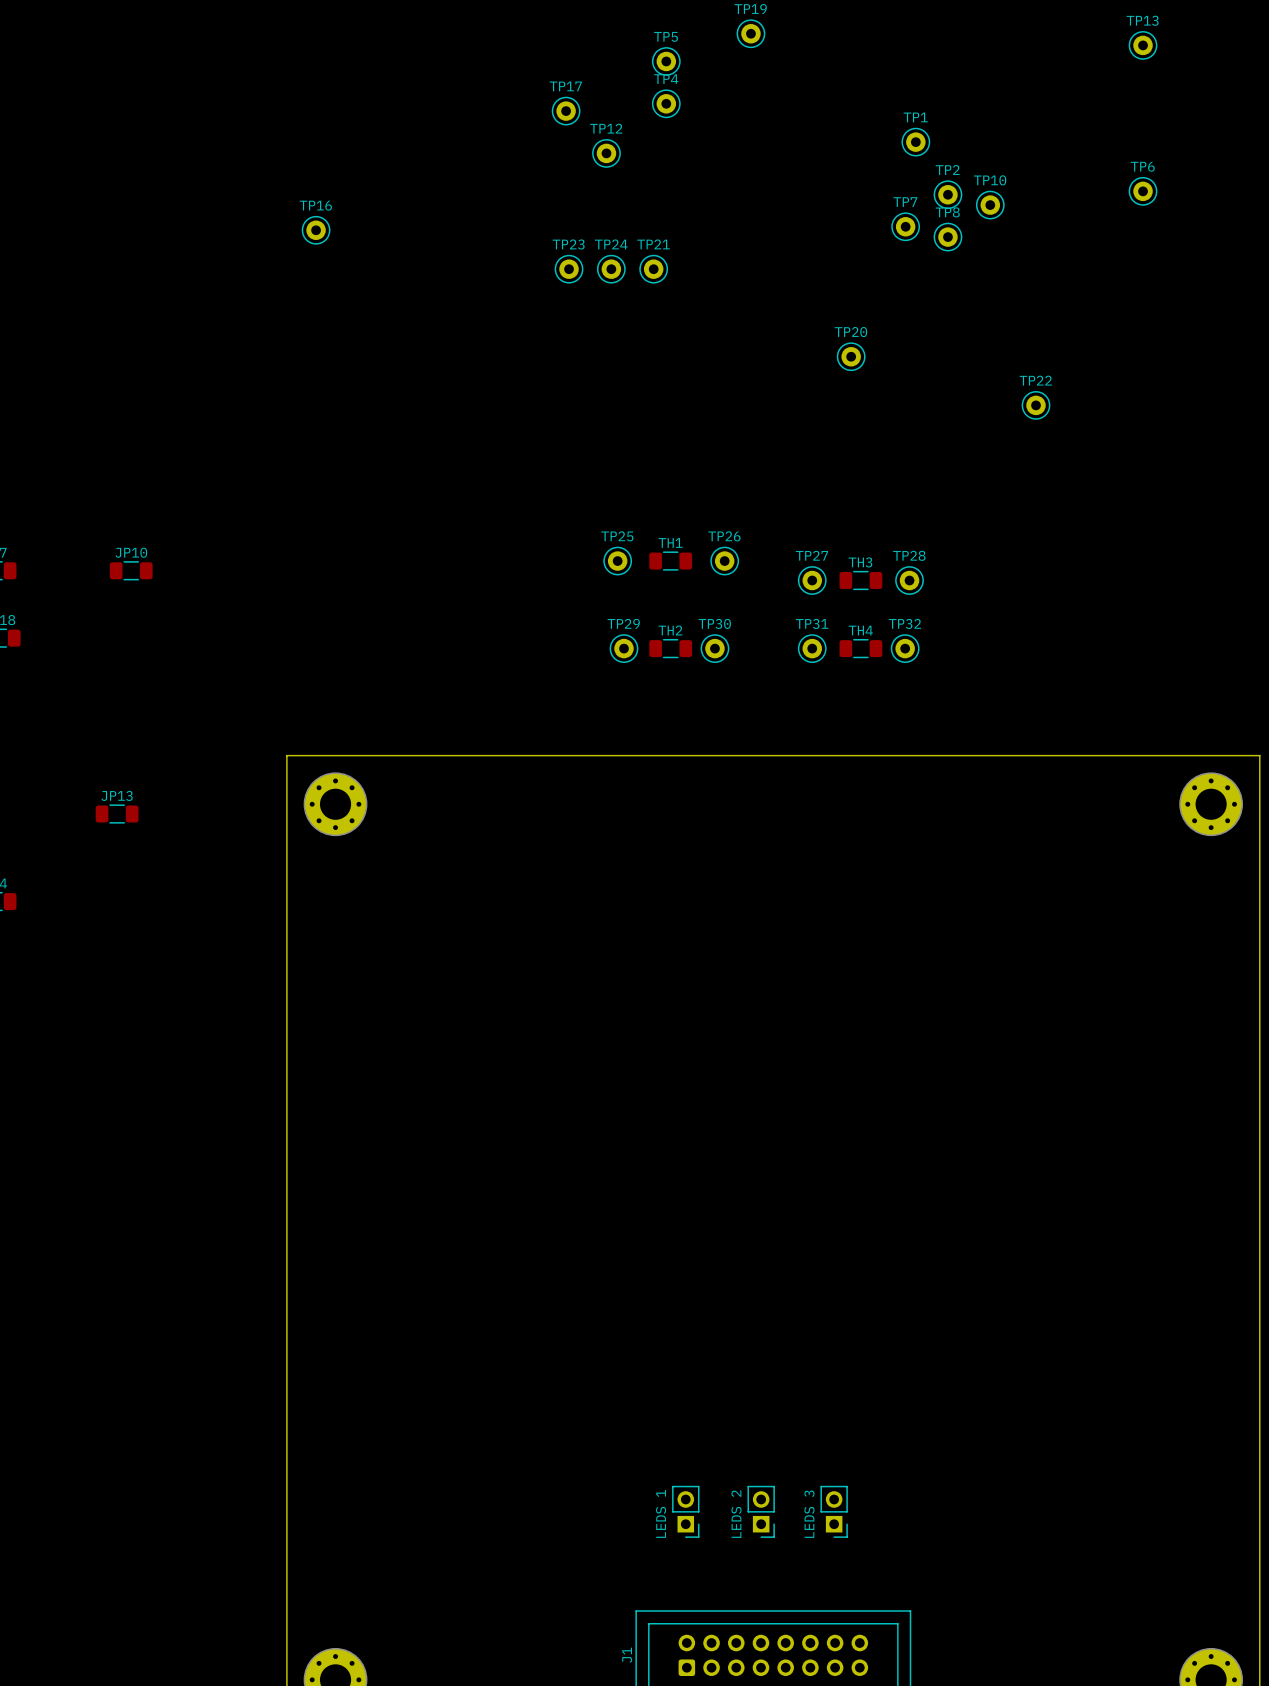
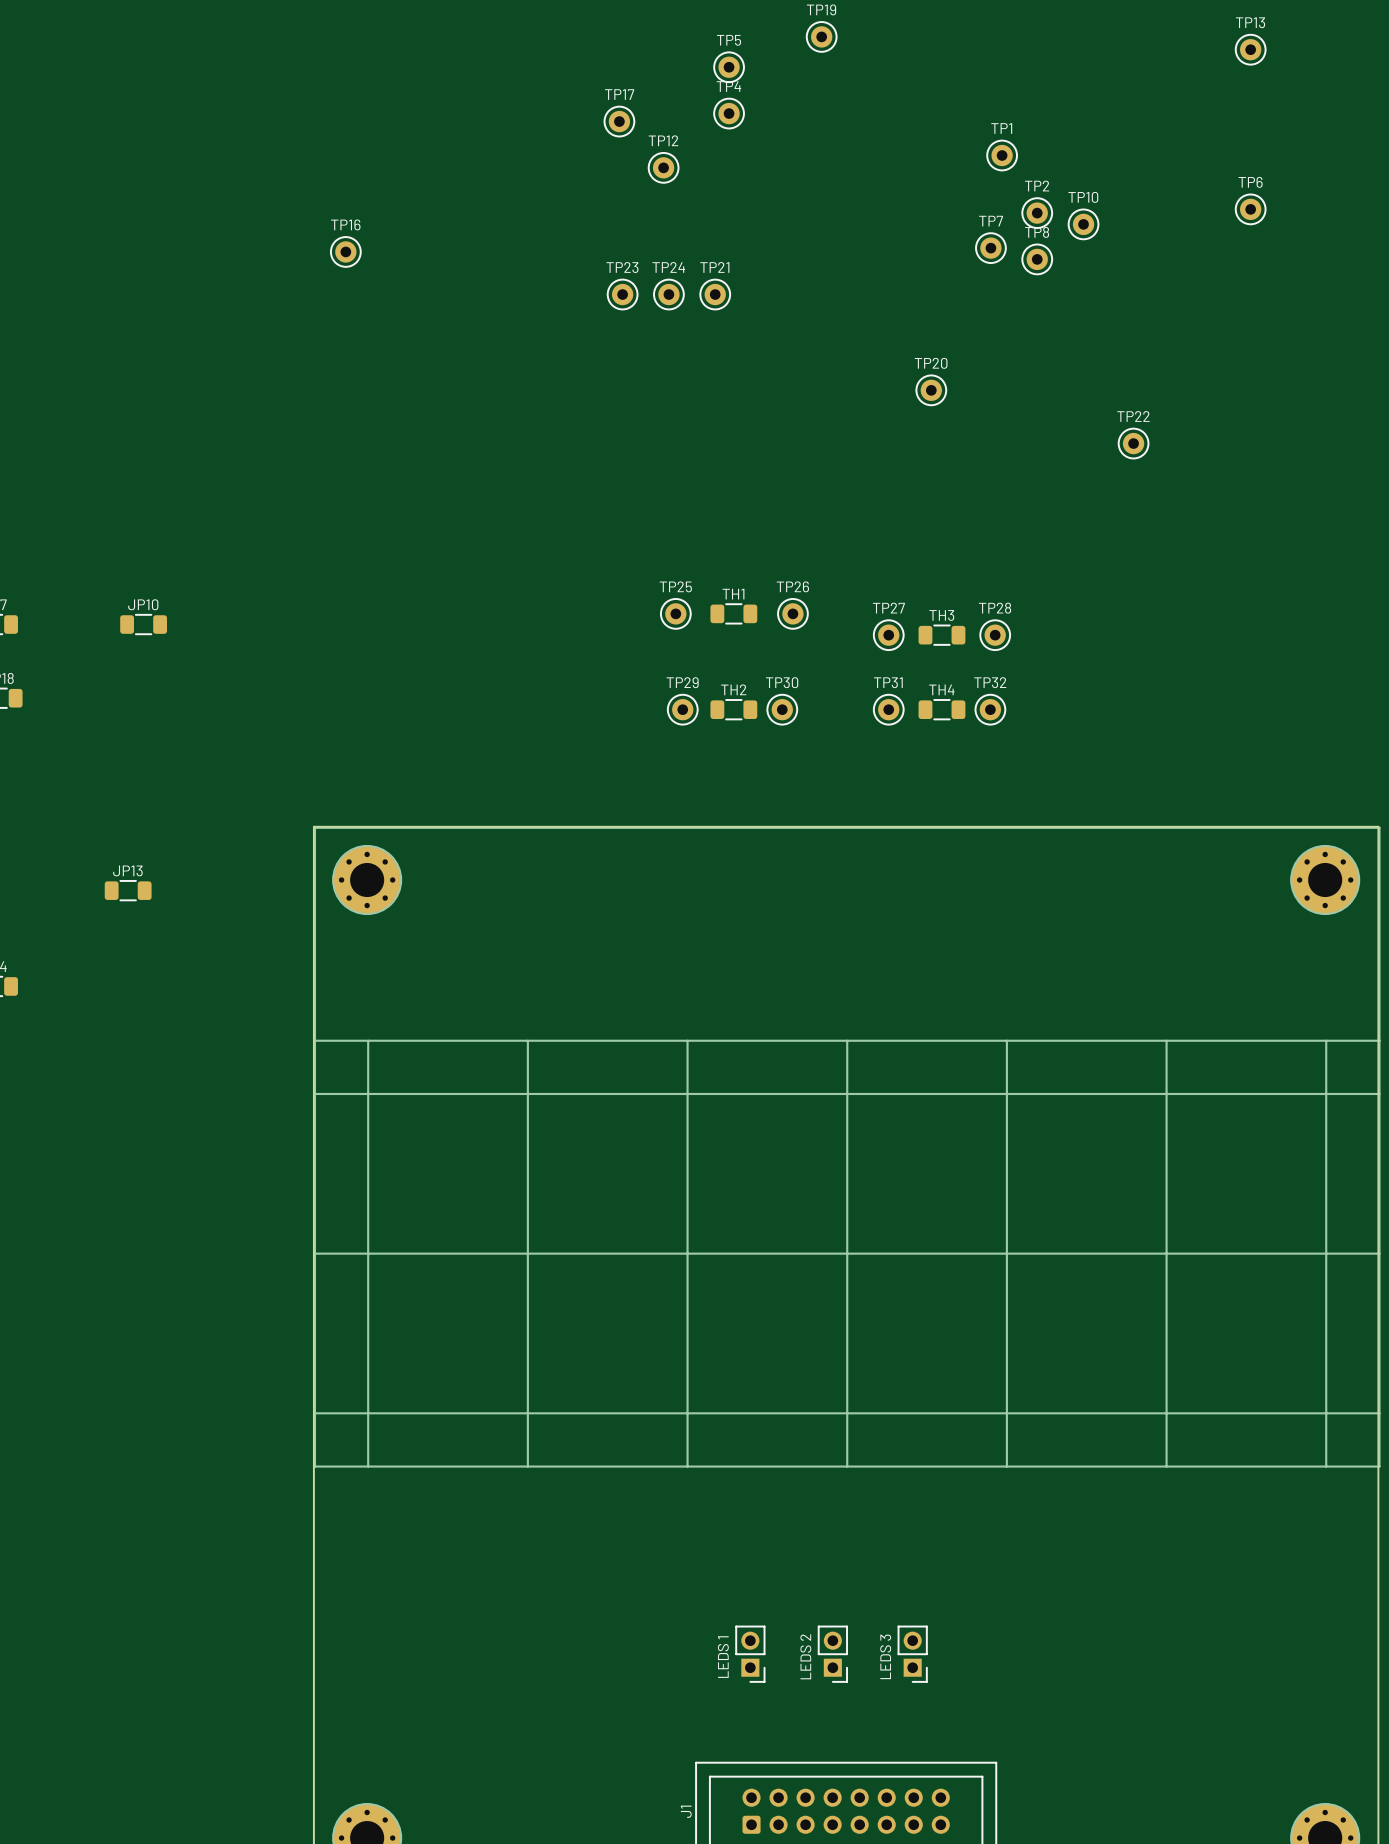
line: none -> (314, 827) (314, 1466) (1379, 1466) (1379, 827) (314, 827)
line: none -> (314, 1040) (1379, 1040)
line: none -> (368, 1040) (368, 1466)
line: none -> (527, 1040) (527, 1466)
line: none -> (687, 1040) (687, 1466)
line: none -> (847, 1040) (847, 1466)
line: none -> (1006, 1040) (1006, 1466)
line: none -> (1166, 1040) (1166, 1466)
line: none -> (1326, 1040) (1326, 1466)
line: none -> (314, 1093) (1379, 1093)
line: none -> (314, 1253) (1379, 1253)
line: none -> (314, 1413) (1379, 1413)

